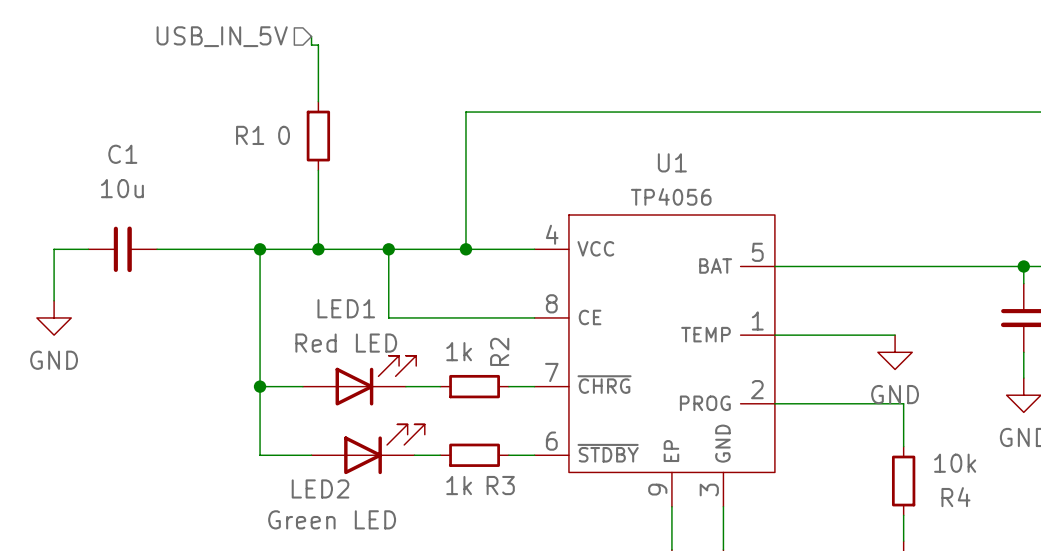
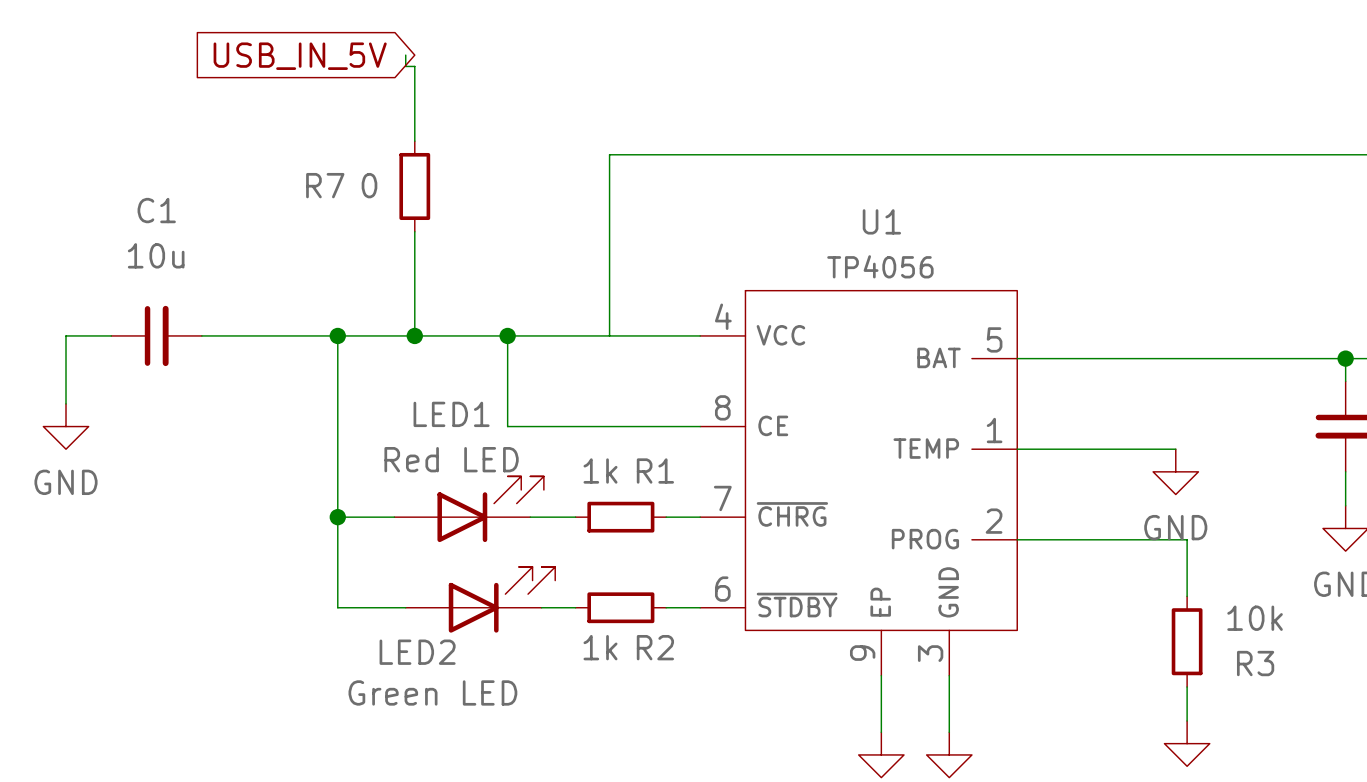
hierarchical label: USB_IN_5V (222, 36) -> none
global label: none -> USB_IN_5V (300, 56)
R1 name: R1 (250, 135) -> R7 (325, 185)
junction: (465, 249) -> none
R2 name: R2 (499, 351) -> R1 (655, 471)
R3 name: R3 (500, 485) -> R2 (655, 647)
R4 name: R4 (955, 497) -> R3 (1255, 663)

